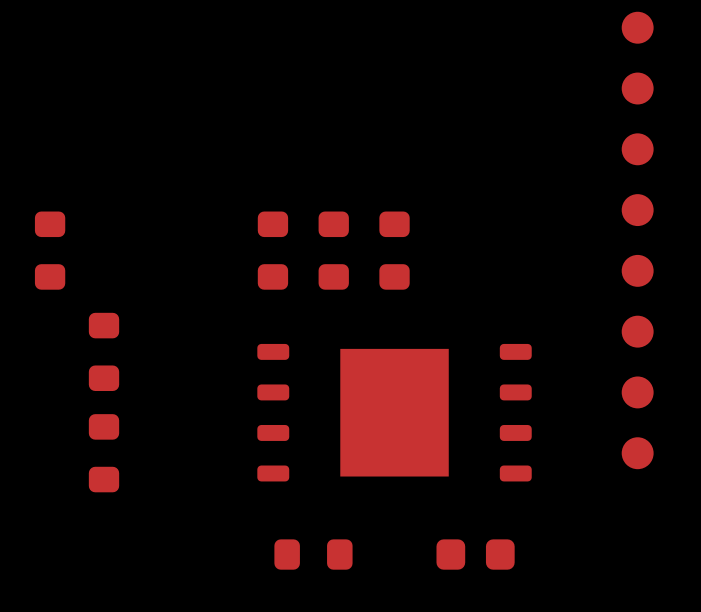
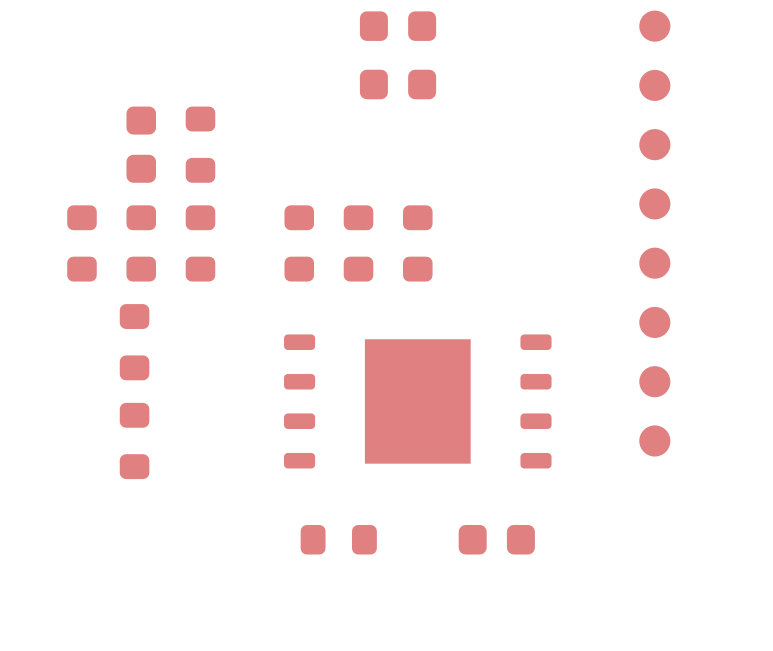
part: none -> (398, 26)
part: none -> (398, 84)
part: none -> (141, 144)
part: none -> (200, 144)
part: none -> (141, 243)
part: none -> (200, 243)

